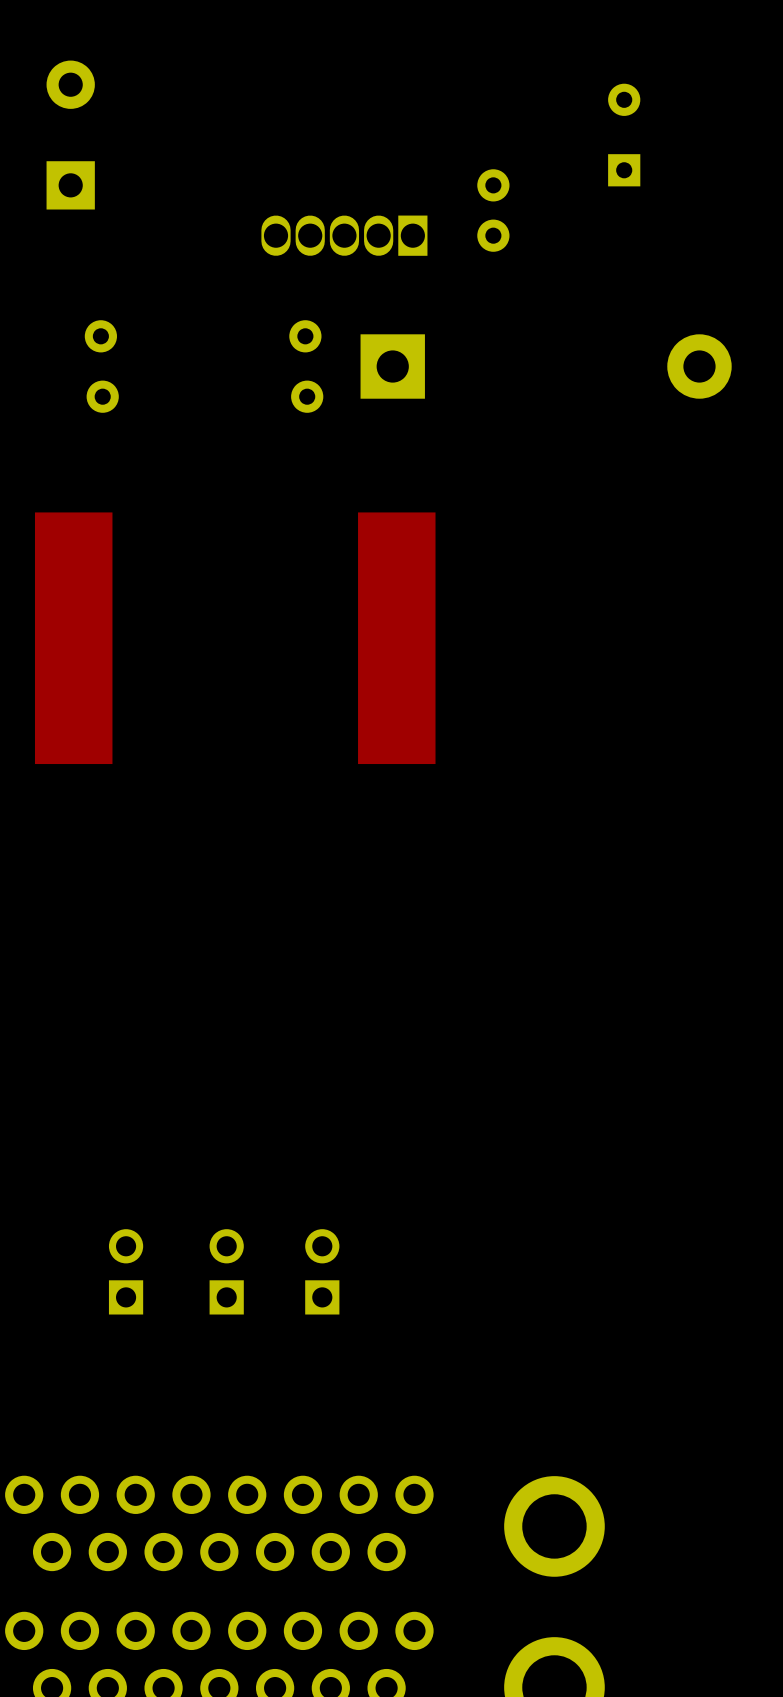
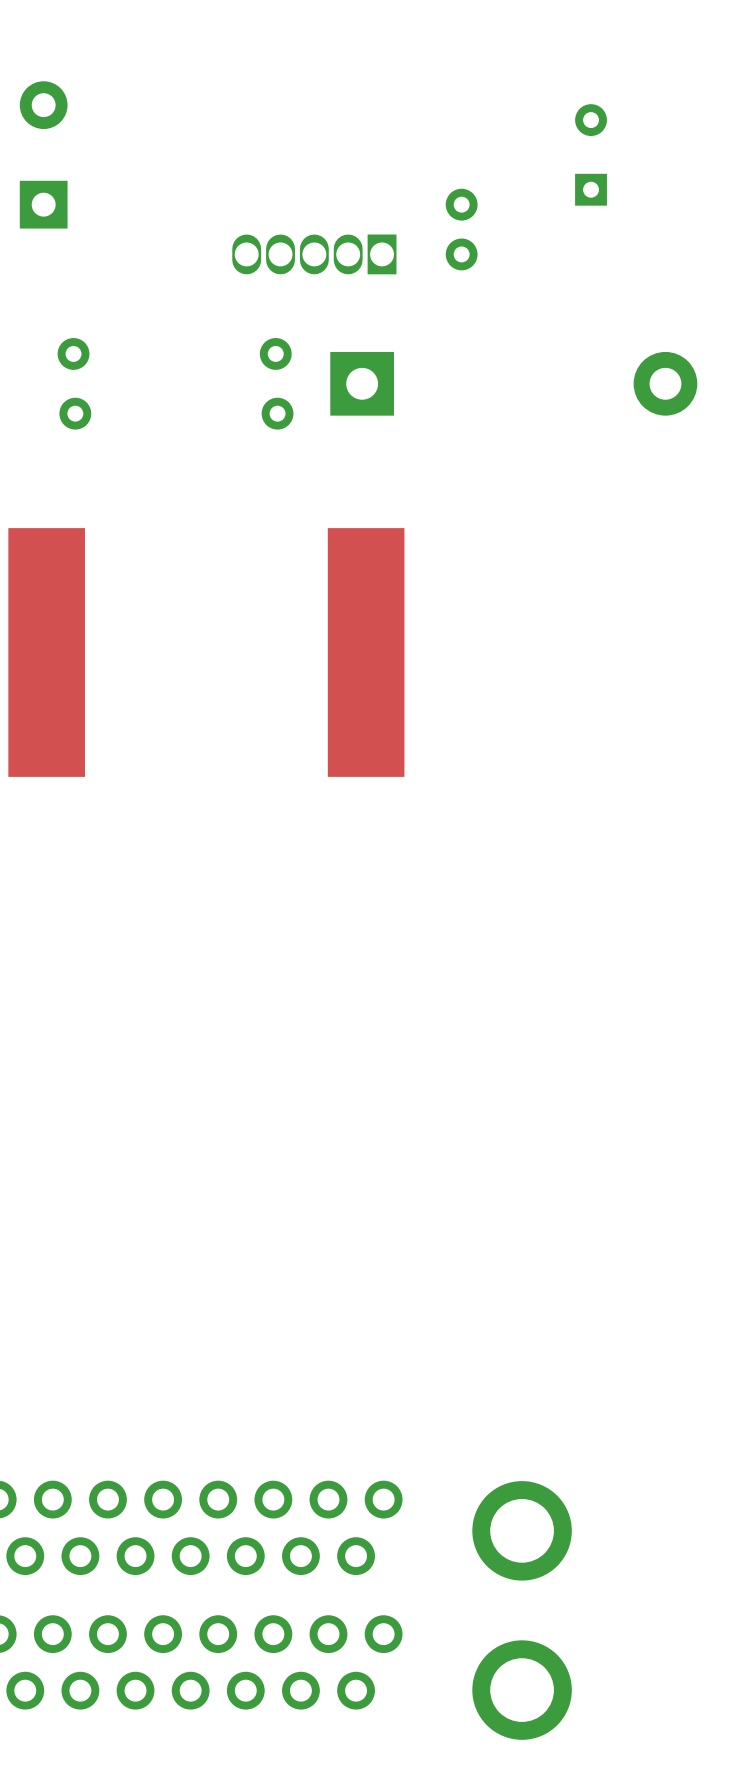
part: (126, 1271) -> none
part: (226, 1271) -> none
part: (322, 1271) -> none

